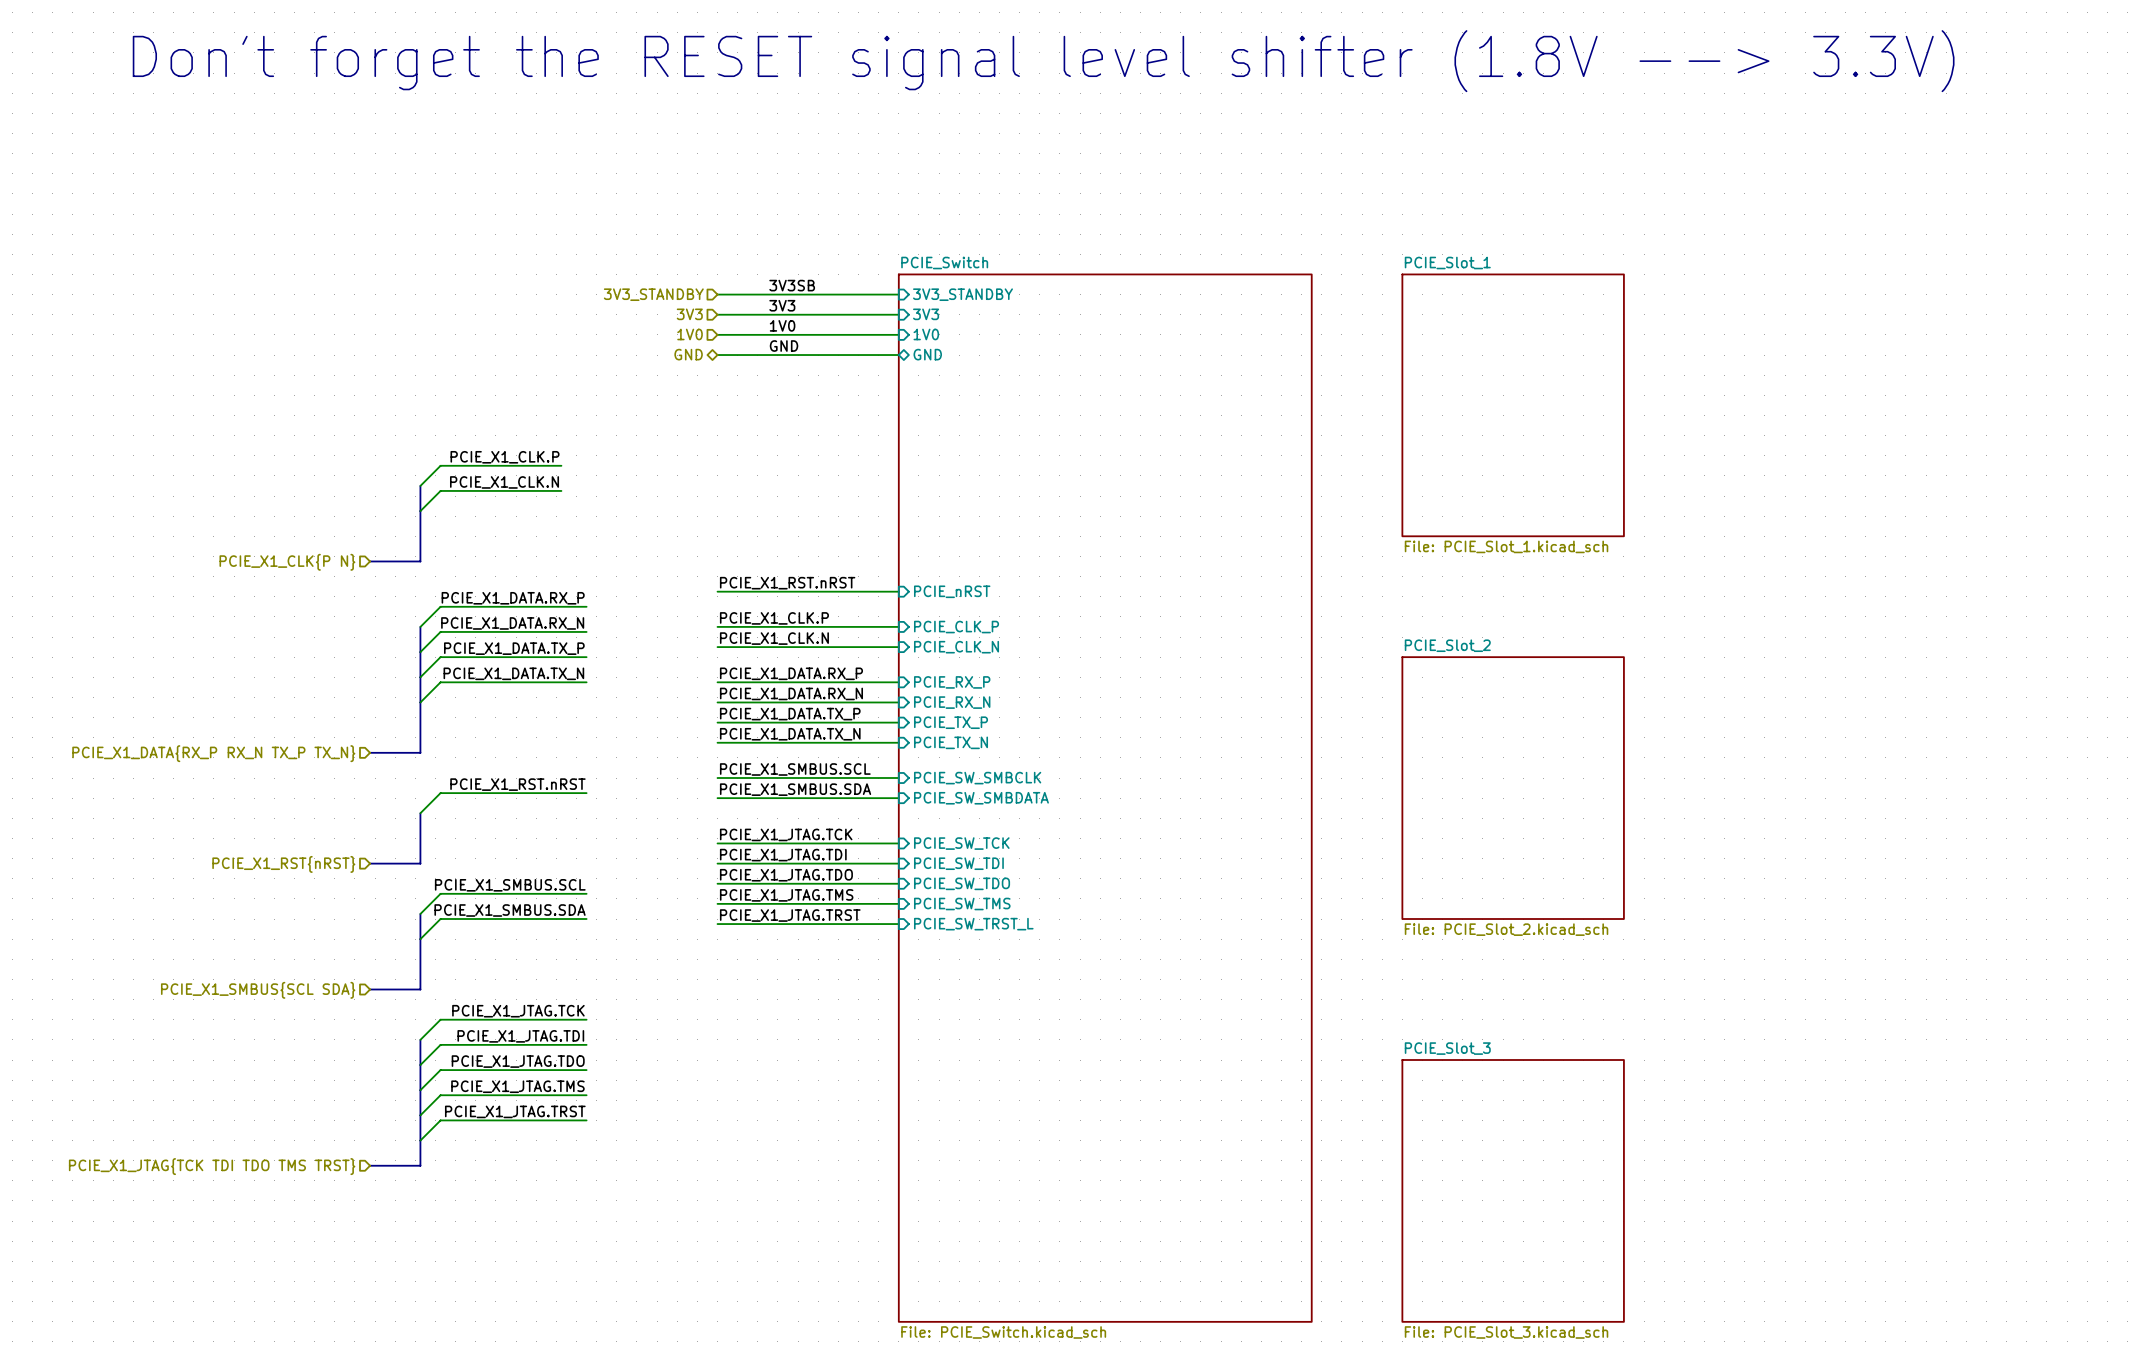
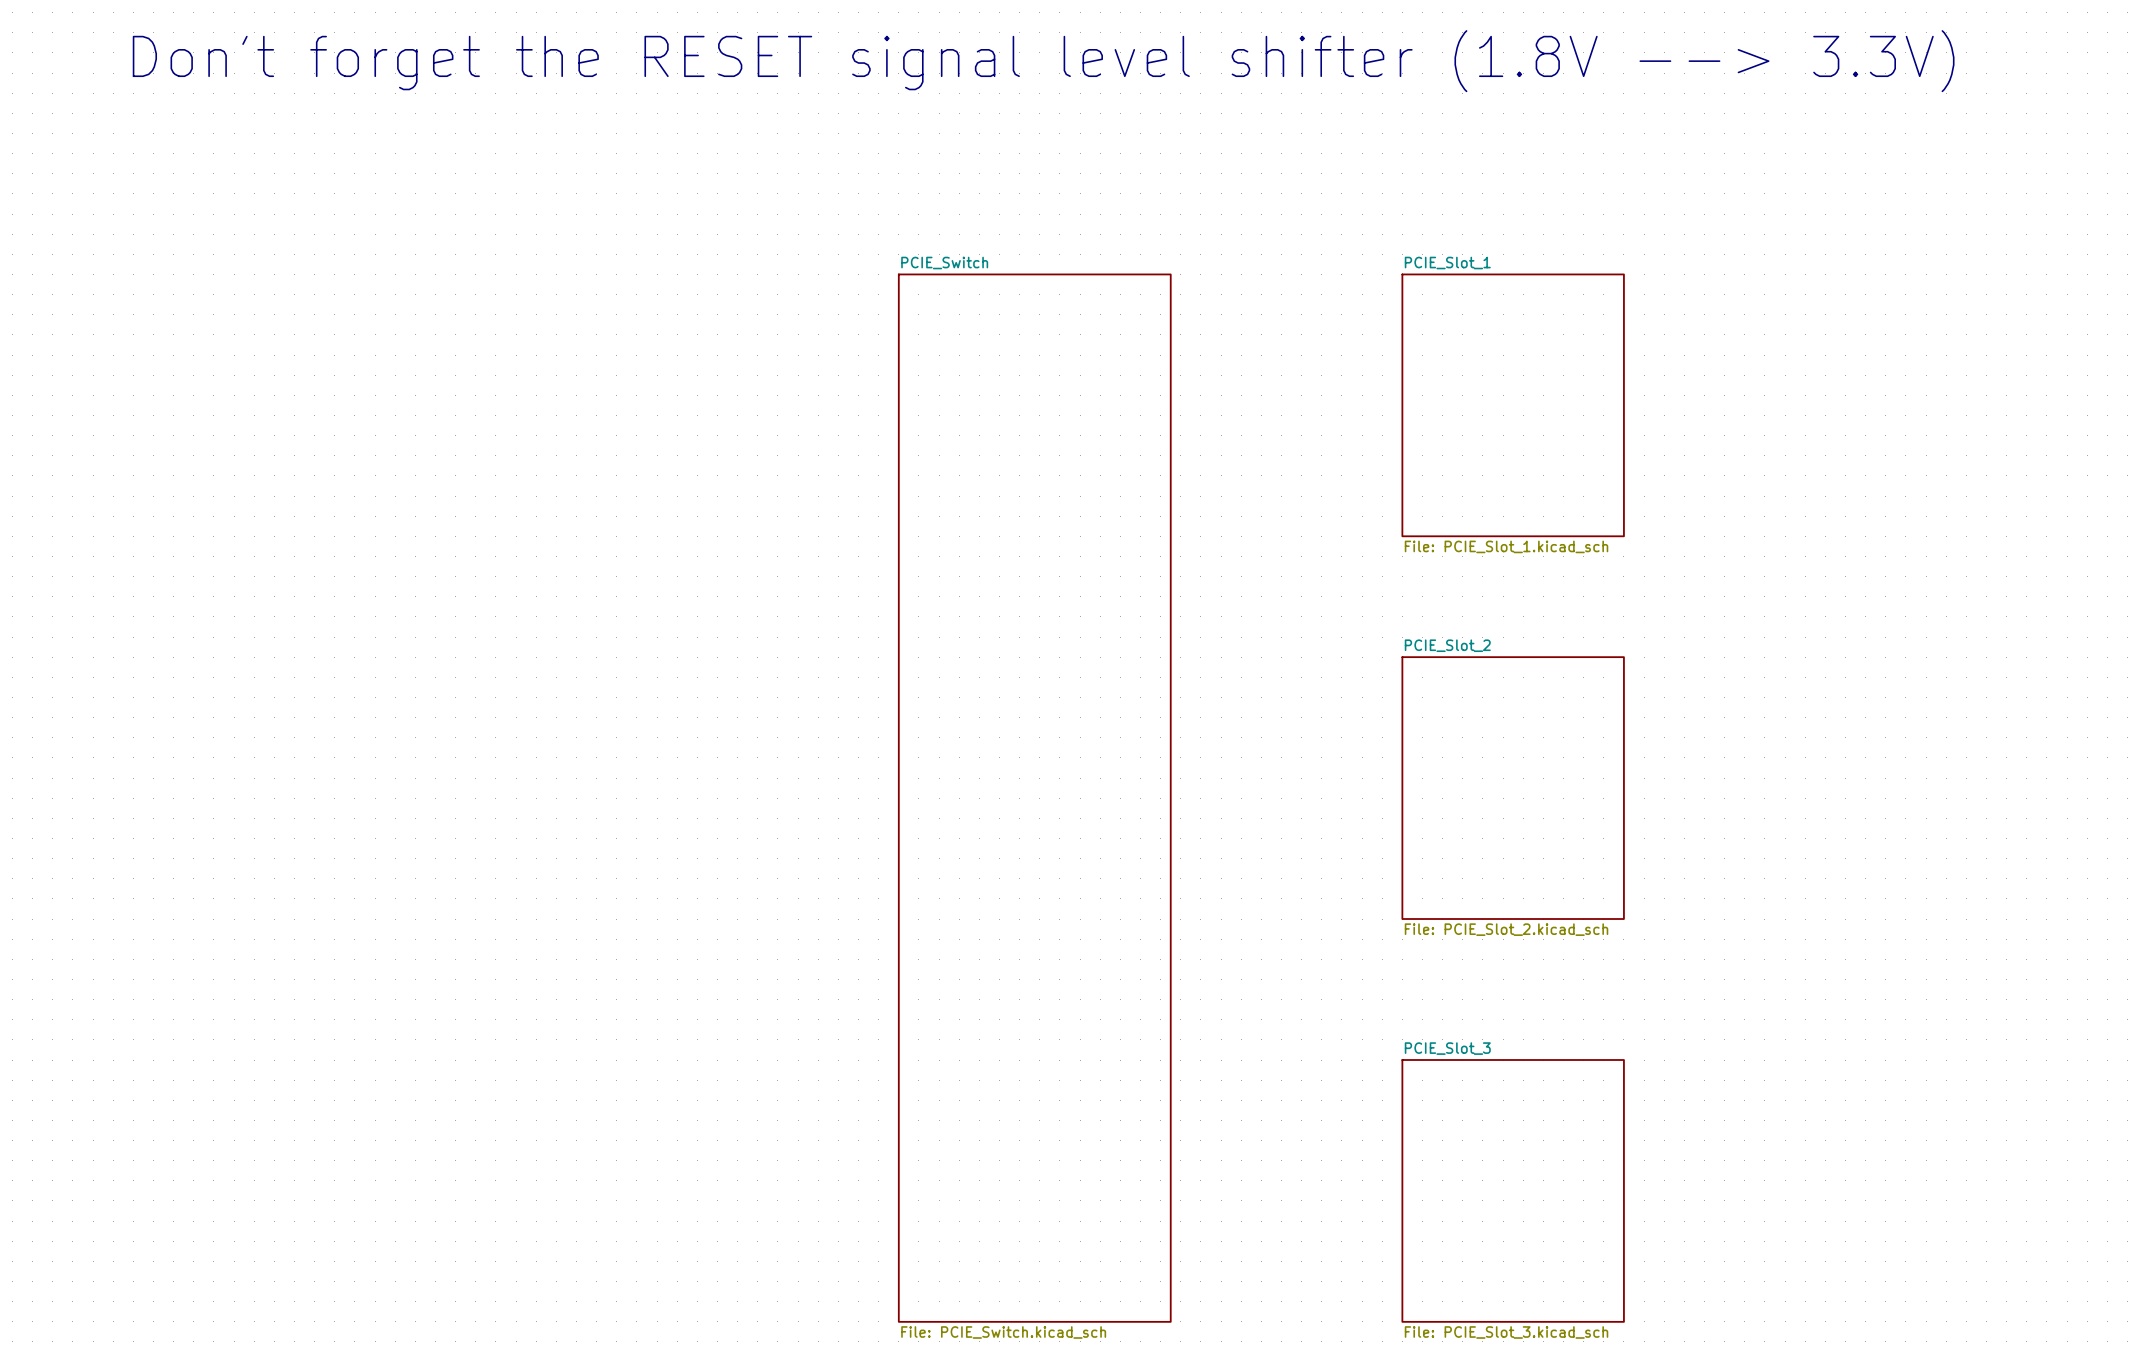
label: 3V3SB (792, 285) -> none
hierarchical label: 3V3_STANDBY (653, 294) -> none
wire: (717, 294) (898, 294) -> none
sheet pin: 3V3_STANDBY (962, 294) -> none
label: 3V3 (782, 305) -> none
hierarchical label: 3V3 (689, 314) -> none
wire: (717, 314) (898, 314) -> none
sheet pin: 3V3 (926, 314) -> none
label: 1V0 (782, 325) -> none
hierarchical label: 1V0 (690, 334) -> none
wire: (717, 334) (898, 334) -> none
sheet pin: 1V0 (926, 334) -> none
label: GND (784, 346) -> none
hierarchical label: GND (688, 354) -> none
sheet pin: GND (927, 354) -> none
wire: (717, 355) (898, 355) -> none
label: PCIE_X1_CLK.P (504, 457) -> none
wire: (440, 465) (561, 465) -> none
wire: (440, 465) (420, 485) -> none
label: PCIE_X1_CLK.N (504, 482) -> none
bus: (420, 485) (420, 561) (370, 561) -> none
wire: (440, 490) (561, 490) -> none
wire: (440, 490) (420, 511) -> none
hierarchical label: PCIE_X1_CLK{P N} (287, 562) -> none
label: PCIE_X1_RST.nRST (787, 583) -> none
wire: (717, 591) (898, 591) -> none
sheet pin: PCIE_nRST (952, 591) -> none
label: PCIE_X1_DATA.RX_P (513, 598) -> none
wire: (440, 606) (586, 606) -> none
wire: (440, 606) (420, 626) -> none
label: PCIE_X1_CLK.P (774, 618) -> none
label: PCIE_X1_DATA.RX_N (512, 623) -> none
bus: (420, 626) (420, 752) (370, 752) -> none
wire: (717, 626) (898, 626) -> none
sheet pin: PCIE_CLK_P (956, 627) -> none
wire: (440, 631) (586, 631) -> none
wire: (440, 631) (420, 652) -> none
label: PCIE_X1_CLK.N (774, 638) -> none
wire: (717, 647) (898, 647) -> none
sheet pin: PCIE_CLK_N (956, 647) -> none
label: PCIE_X1_DATA.TX_P (514, 648) -> none
wire: (440, 657) (586, 657) -> none
wire: (440, 657) (420, 677) -> none
label: PCIE_X1_DATA.TX_N (513, 673) -> none
label: PCIE_X1_DATA.RX_P (791, 673) -> none
wire: (440, 682) (586, 682) -> none
wire: (440, 682) (420, 702) -> none
wire: (717, 682) (898, 682) -> none
sheet pin: PCIE_RX_P (952, 682) -> none
label: PCIE_X1_DATA.RX_N (791, 693) -> none
wire: (717, 702) (898, 702) -> none
sheet pin: PCIE_RX_N (952, 702) -> none
label: PCIE_X1_DATA.TX_P (790, 714) -> none
wire: (717, 722) (898, 722) -> none
sheet pin: PCIE_TX_P (951, 722) -> none
label: PCIE_X1_DATA.TX_N (790, 734) -> none
wire: (717, 742) (898, 742) -> none
sheet pin: PCIE_TX_N (951, 742) -> none
hierarchical label: PCIE_X1_DATA{RX_P RX_N TX_P TX_N} (213, 753) -> none
label: PCIE_X1_SMBUS.SCL (795, 769) -> none
wire: (717, 778) (898, 778) -> none
sheet pin: PCIE_SW_SMBCLK (977, 778) -> none
label: PCIE_X1_RST.nRST (517, 784) -> none
label: PCIE_X1_SMBUS.SDA (795, 789) -> none
wire: (440, 793) (586, 793) -> none
wire: (440, 793) (420, 813) -> none
wire: (717, 798) (898, 798) -> none
sheet pin: PCIE_SW_SMBDATA (981, 798) -> none
sheet PCIE_Switch: none -> File: PCIE_Switch.kicad_sch (1034, 798)
sheet PCIE_Switch: File: PCIE_Switch.kicad_sch (1105, 798) -> none
bus: (420, 813) (420, 863) (370, 863) -> none
label: PCIE_X1_JTAG.TCK (786, 834) -> none
wire: (717, 843) (898, 843) -> none
sheet pin: PCIE_SW_TCK (961, 843) -> none
label: PCIE_X1_JTAG.TDI (783, 855) -> none
wire: (717, 863) (898, 863) -> none
sheet pin: PCIE_SW_TDI (958, 863) -> none
hierarchical label: PCIE_X1_RST{nRST} (283, 864) -> none
label: PCIE_X1_JTAG.TDO (786, 875) -> none
wire: (717, 883) (898, 883) -> none
sheet pin: PCIE_SW_TDO (962, 883) -> none
label: PCIE_X1_SMBUS.SCL (510, 885) -> none
wire: (440, 893) (586, 893) -> none
wire: (440, 893) (420, 913) -> none
label: PCIE_X1_JTAG.TMS (786, 895) -> none
wire: (717, 903) (898, 903) -> none
sheet pin: PCIE_SW_TMS (962, 903) -> none
label: PCIE_X1_SMBUS.SDA (510, 910) -> none
bus: (420, 913) (420, 989) (370, 989) -> none
label: PCIE_X1_JTAG.TRST (790, 915) -> none
wire: (440, 919) (586, 919) -> none
wire: (440, 919) (420, 939) -> none
wire: (717, 924) (898, 924) -> none
sheet pin: PCIE_SW_TRST_L (973, 924) -> none
hierarchical label: PCIE_X1_SMBUS{SCL SDA} (258, 990) -> none
label: PCIE_X1_JTAG.TCK (518, 1011) -> none
wire: (440, 1019) (586, 1019) -> none
wire: (440, 1019) (420, 1039) -> none
label: PCIE_X1_JTAG.TDI (520, 1036) -> none
bus: (420, 1039) (420, 1165) (370, 1165) -> none
wire: (440, 1044) (586, 1044) -> none
wire: (440, 1044) (420, 1065) -> none
label: PCIE_X1_JTAG.TDO (518, 1061) -> none
wire: (440, 1070) (586, 1070) -> none
wire: (440, 1070) (420, 1090) -> none
label: PCIE_X1_JTAG.TMS (517, 1086) -> none
wire: (440, 1095) (586, 1095) -> none
wire: (440, 1095) (420, 1115) -> none
label: PCIE_X1_JTAG.TRST (515, 1111) -> none
wire: (440, 1120) (586, 1120) -> none
wire: (440, 1120) (420, 1140) -> none
hierarchical label: PCIE_X1_JTAG{TCK TDI TDO TMS TRST} (212, 1166) -> none

